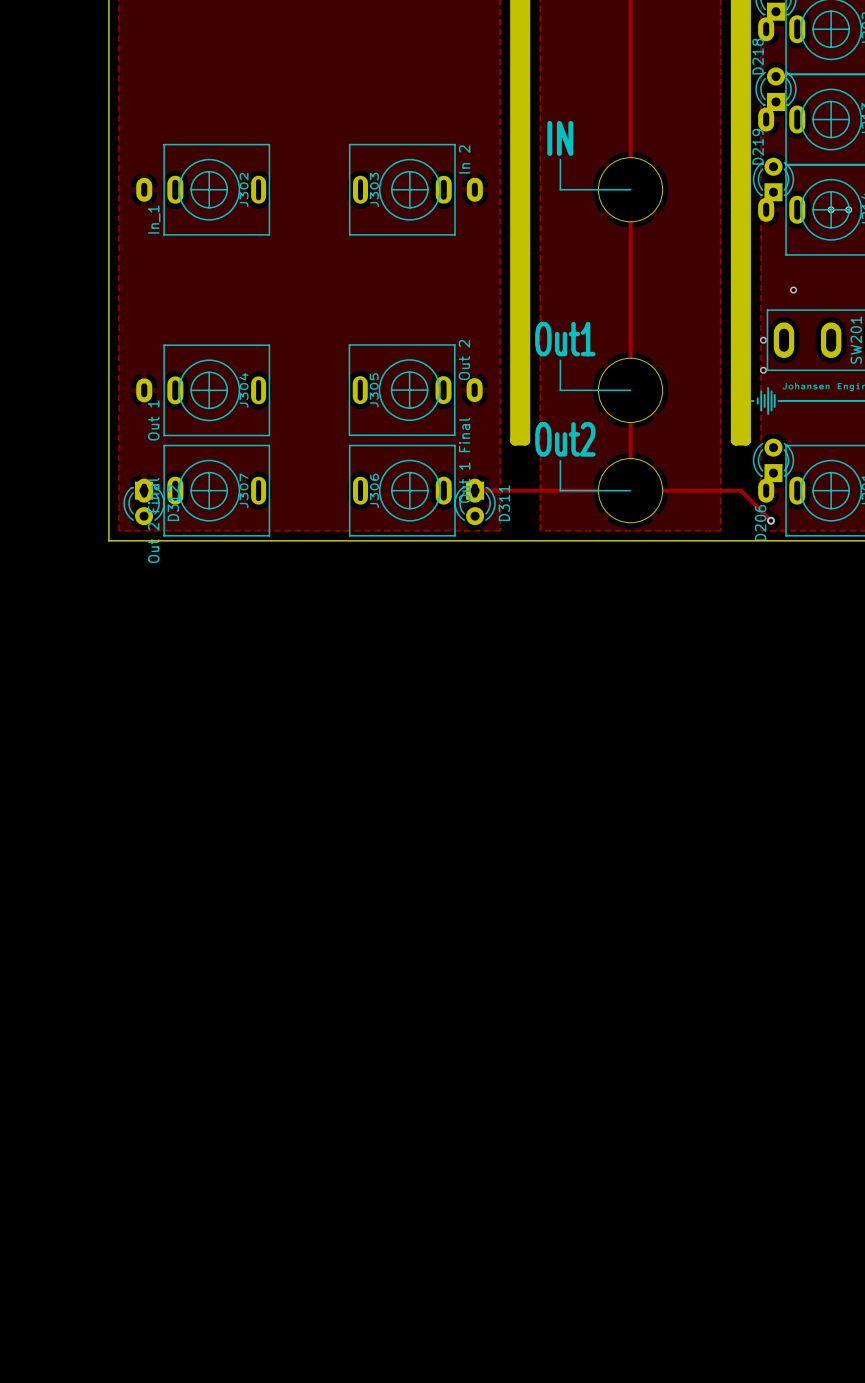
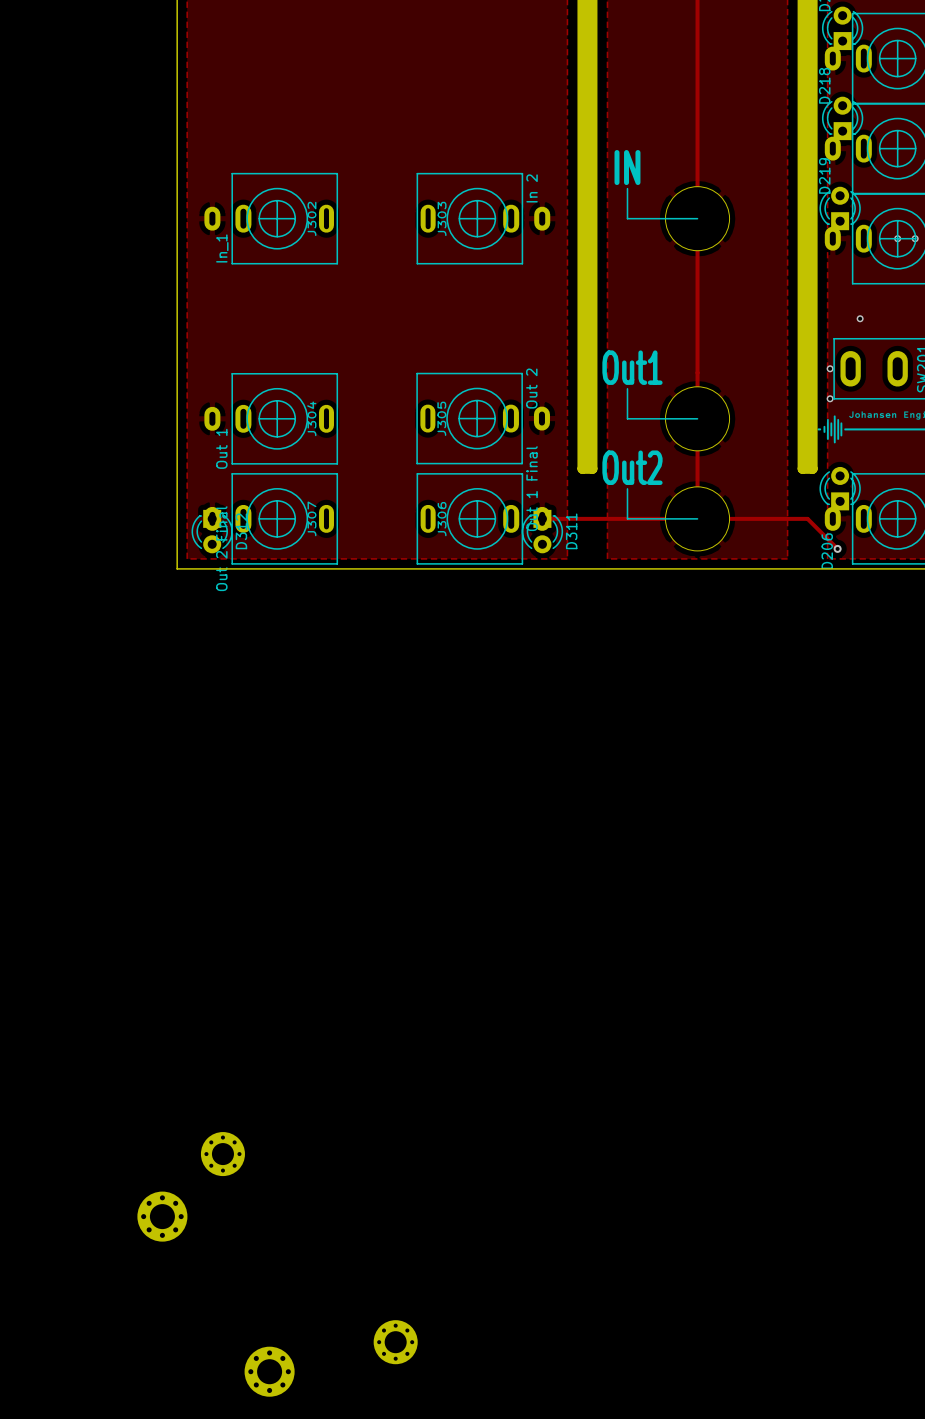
part: none -> (222, 1154)
part: none -> (162, 1216)
part: none -> (395, 1342)
part: none -> (269, 1371)

